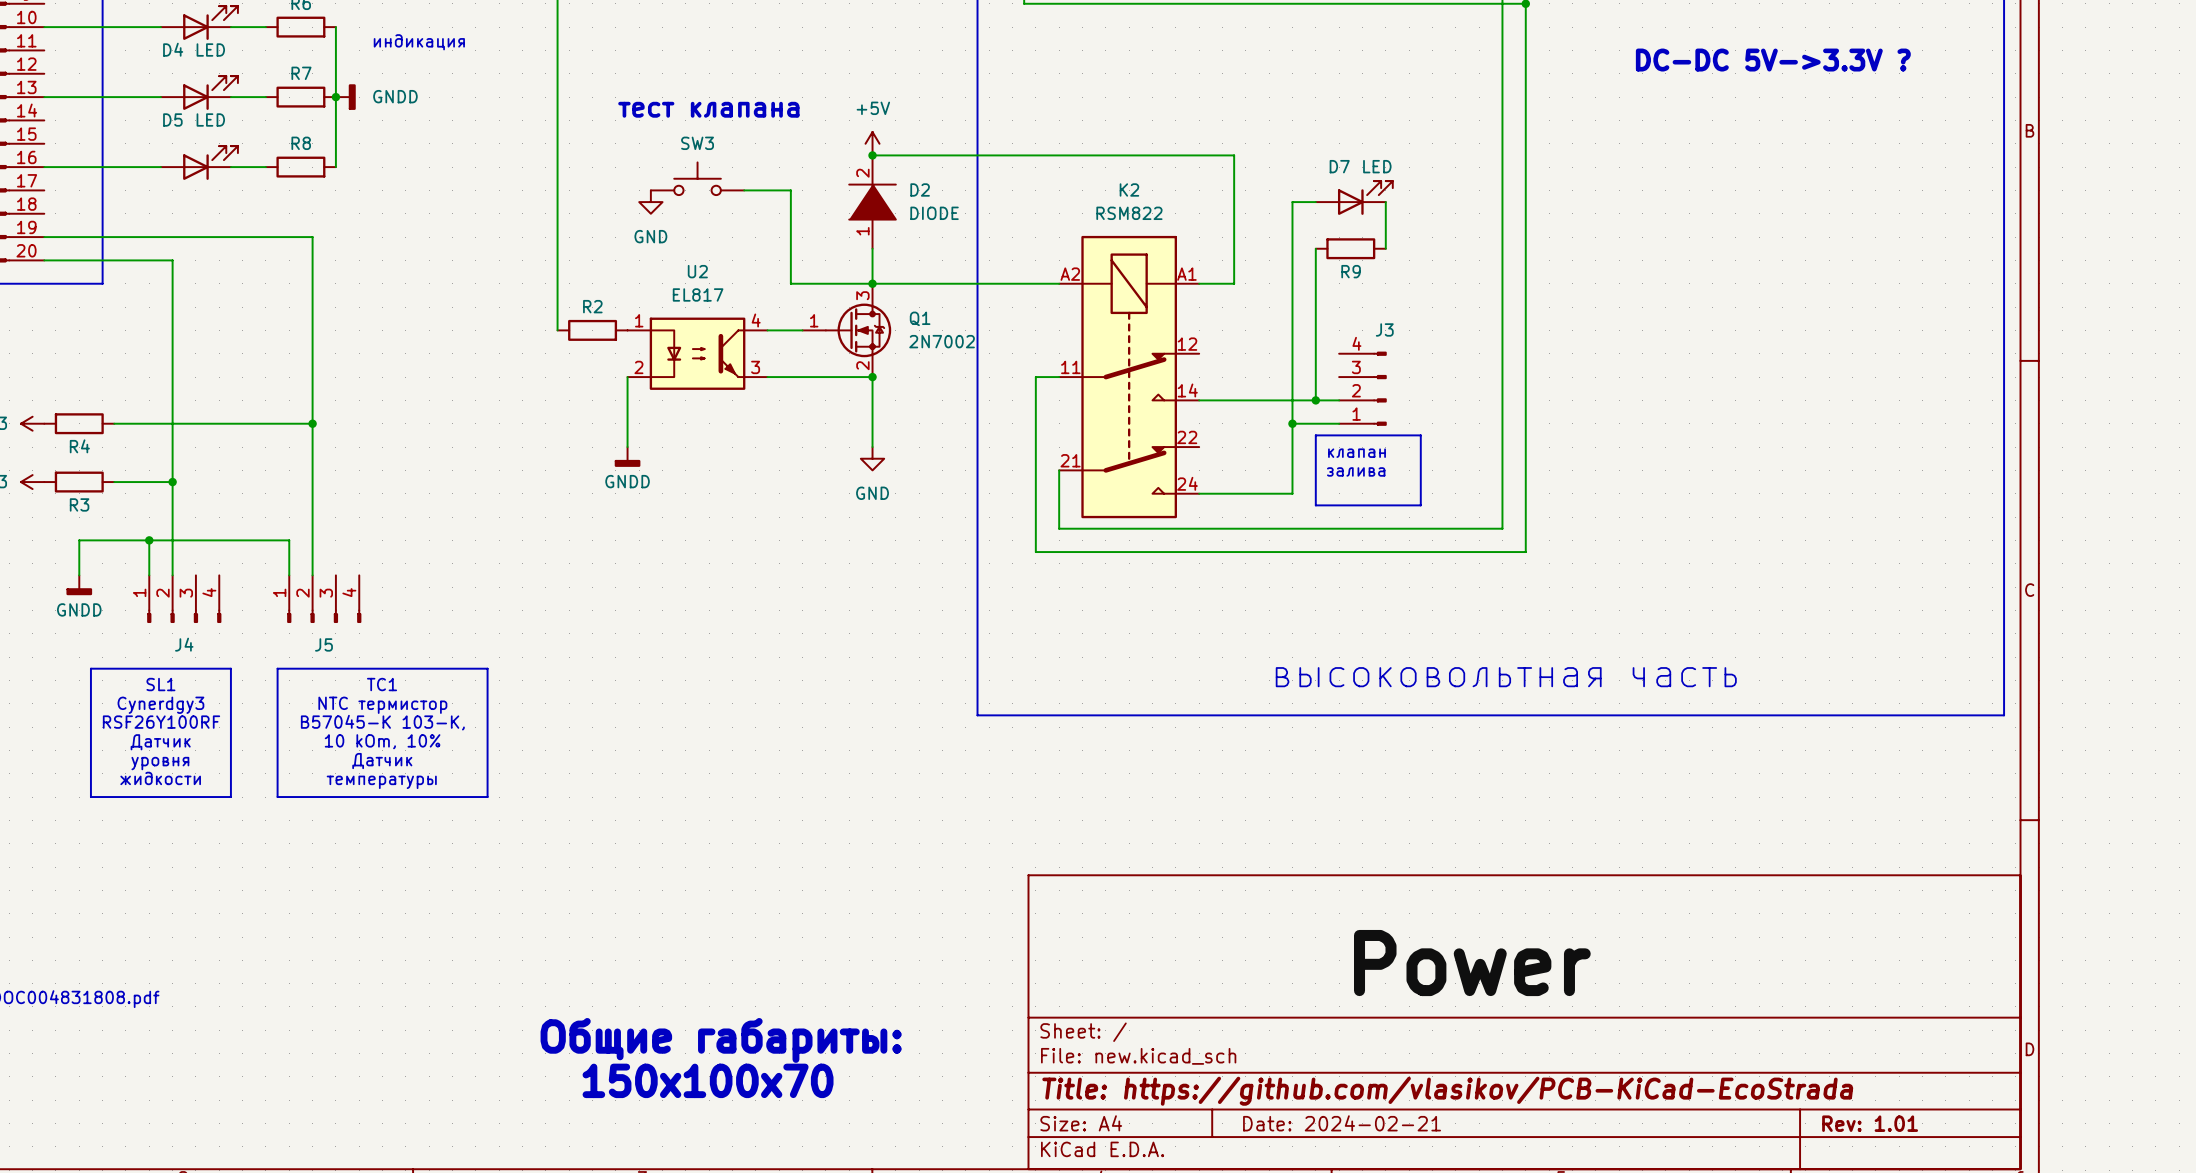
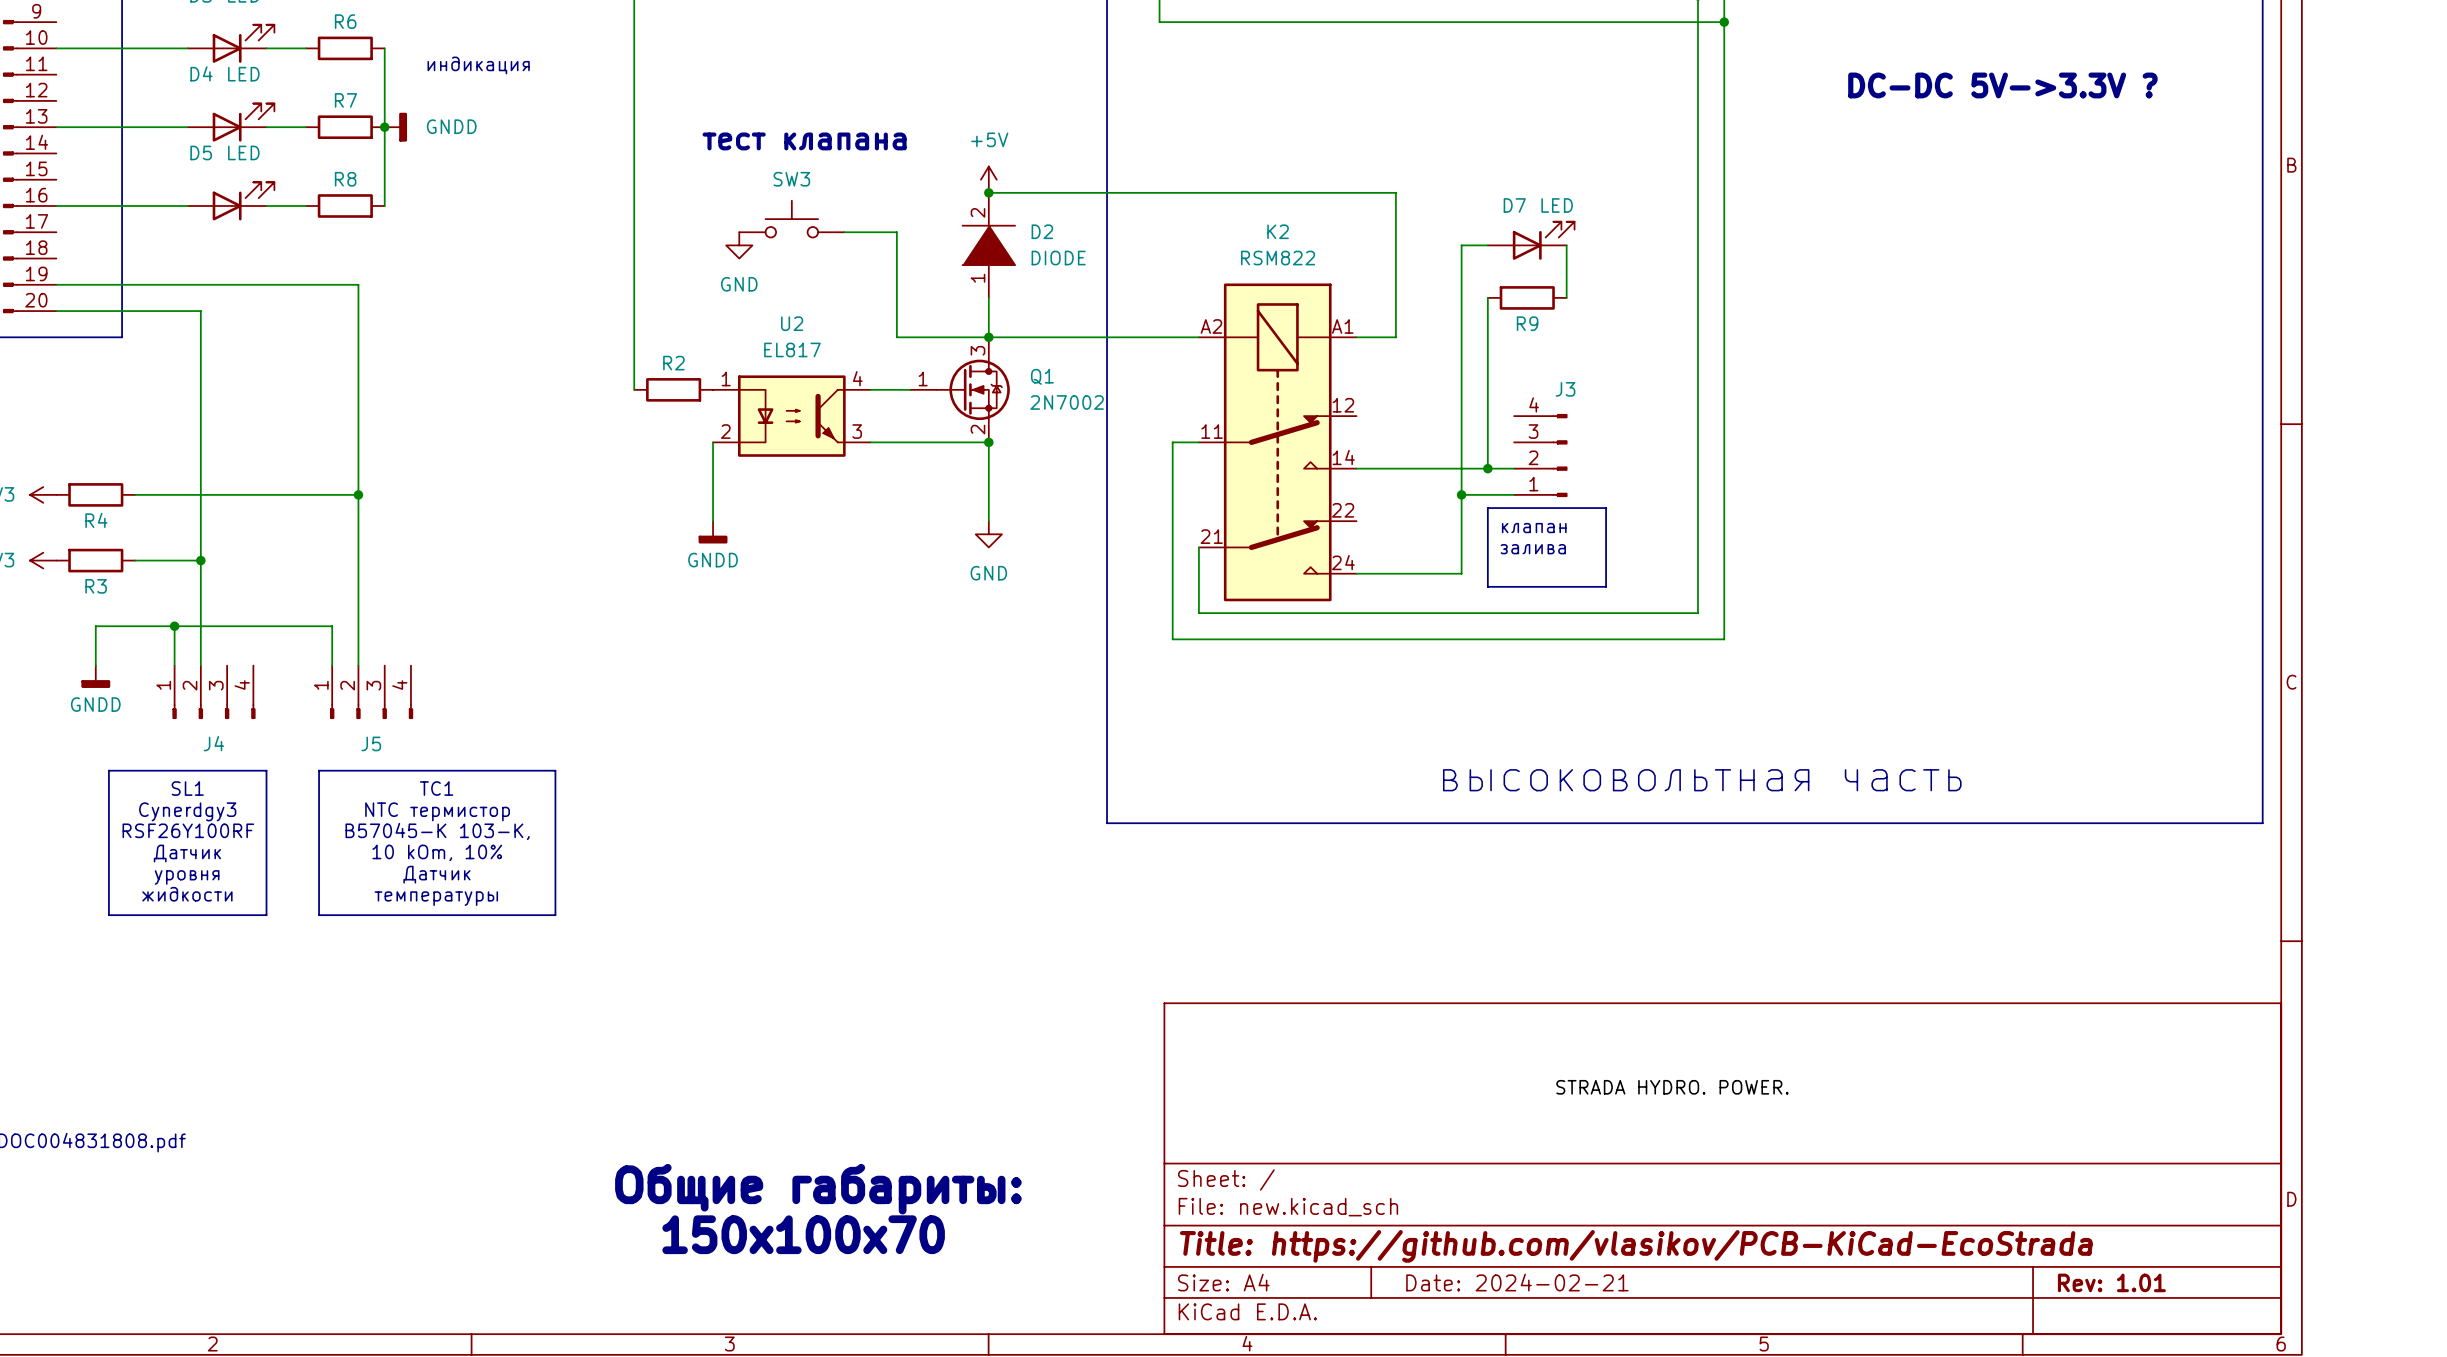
label: none -> STRADA HYDRO. POWER. (1672, 1087)
label: Power (1472, 963) -> none

